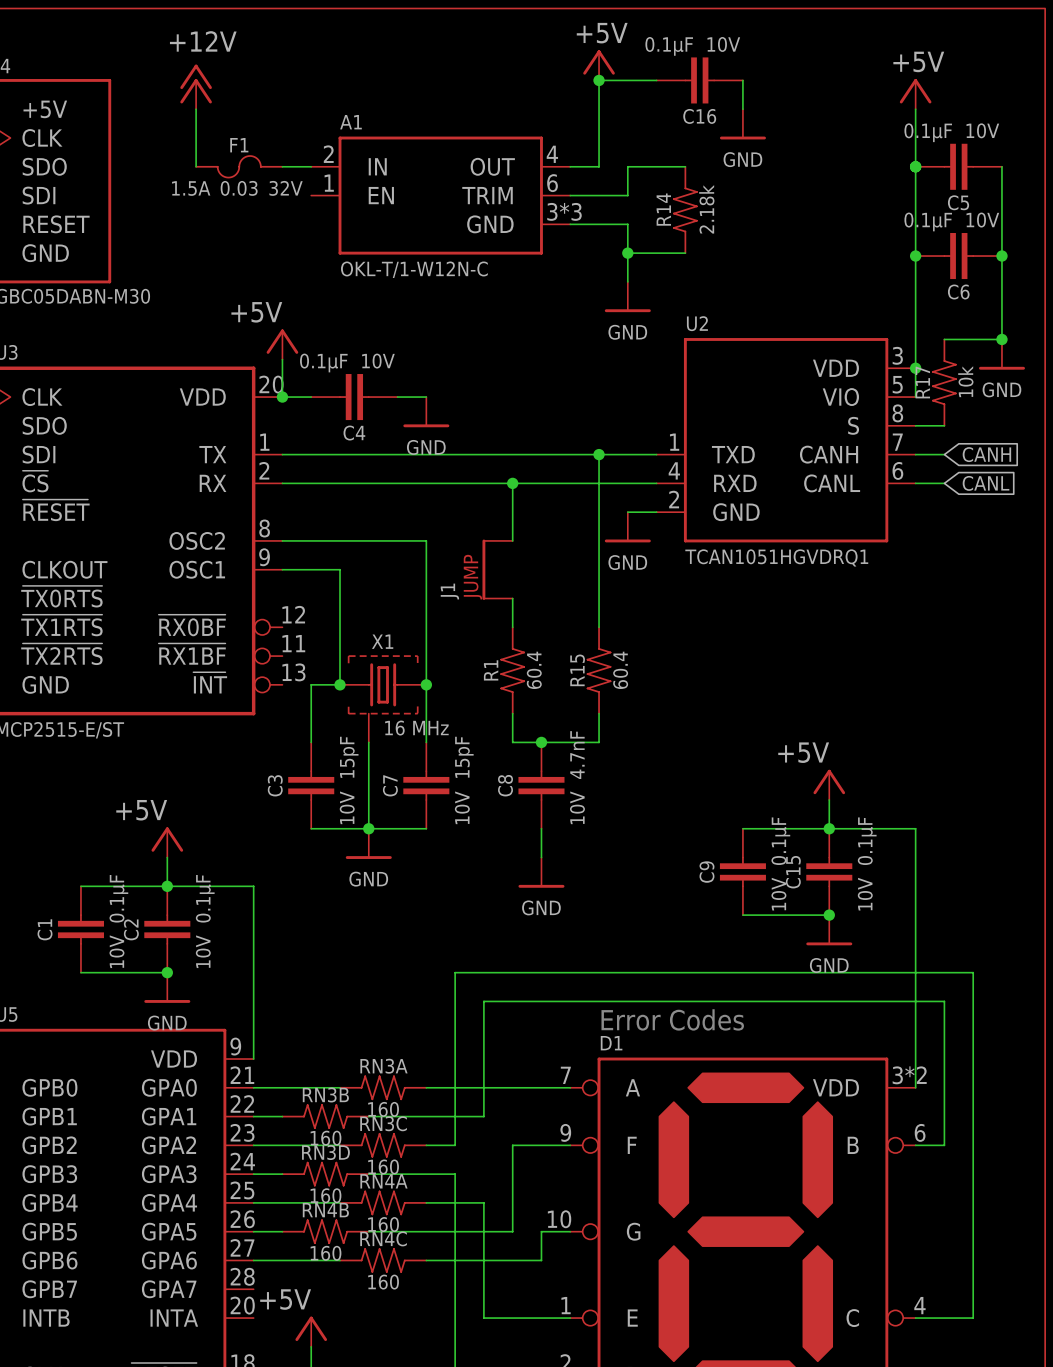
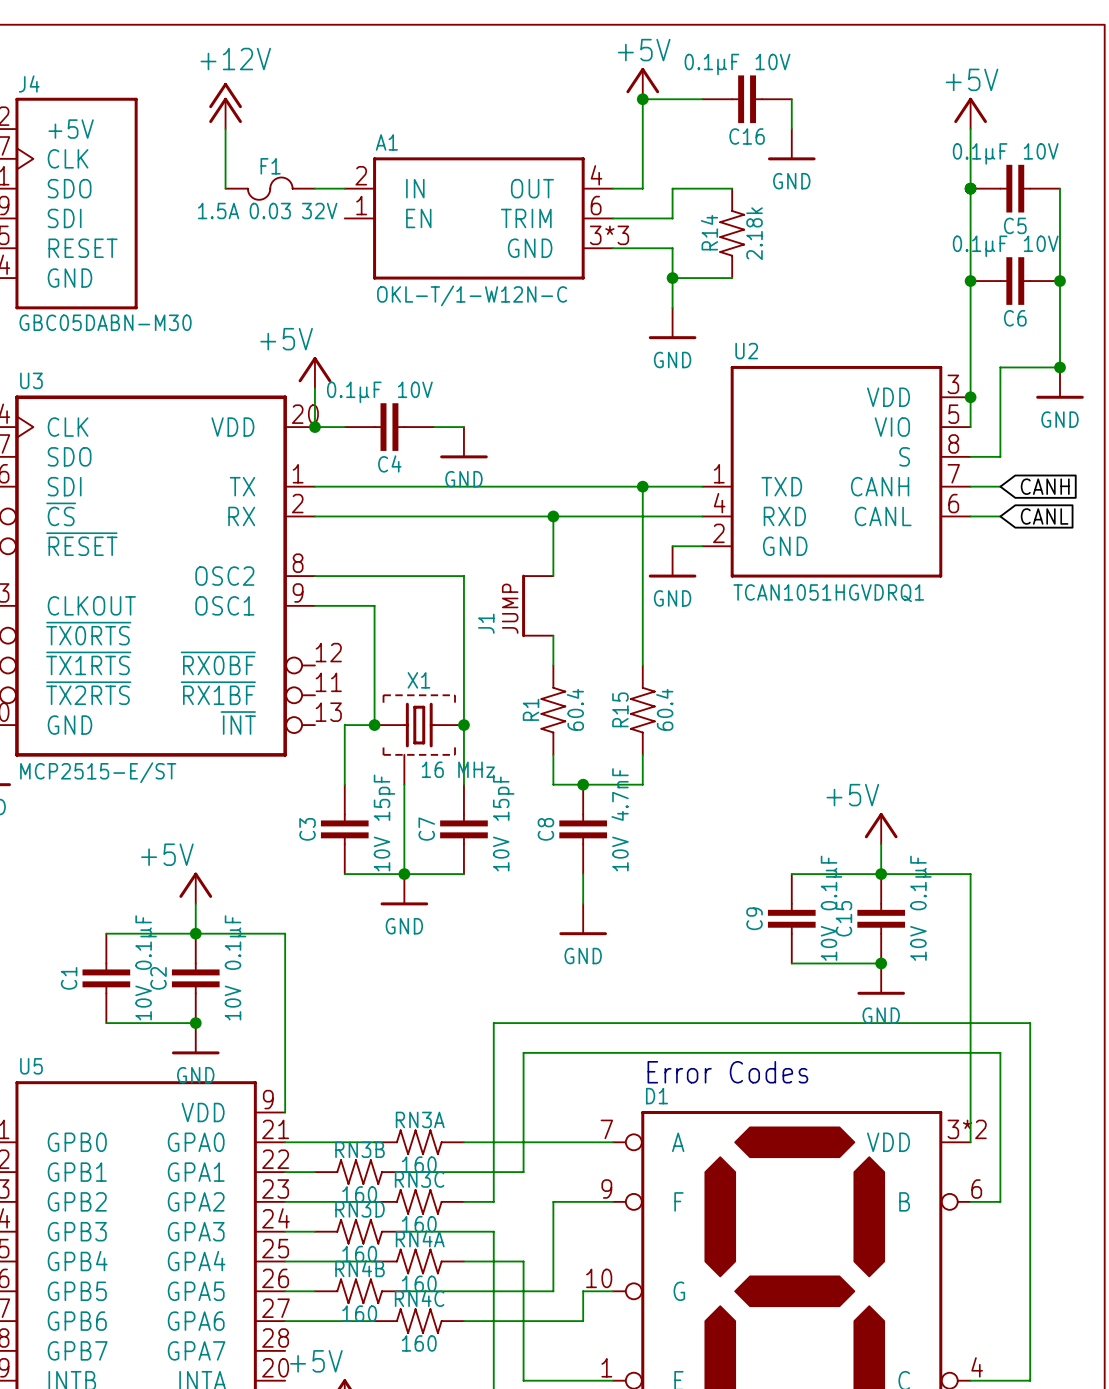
R17: (944, 382) -> none

